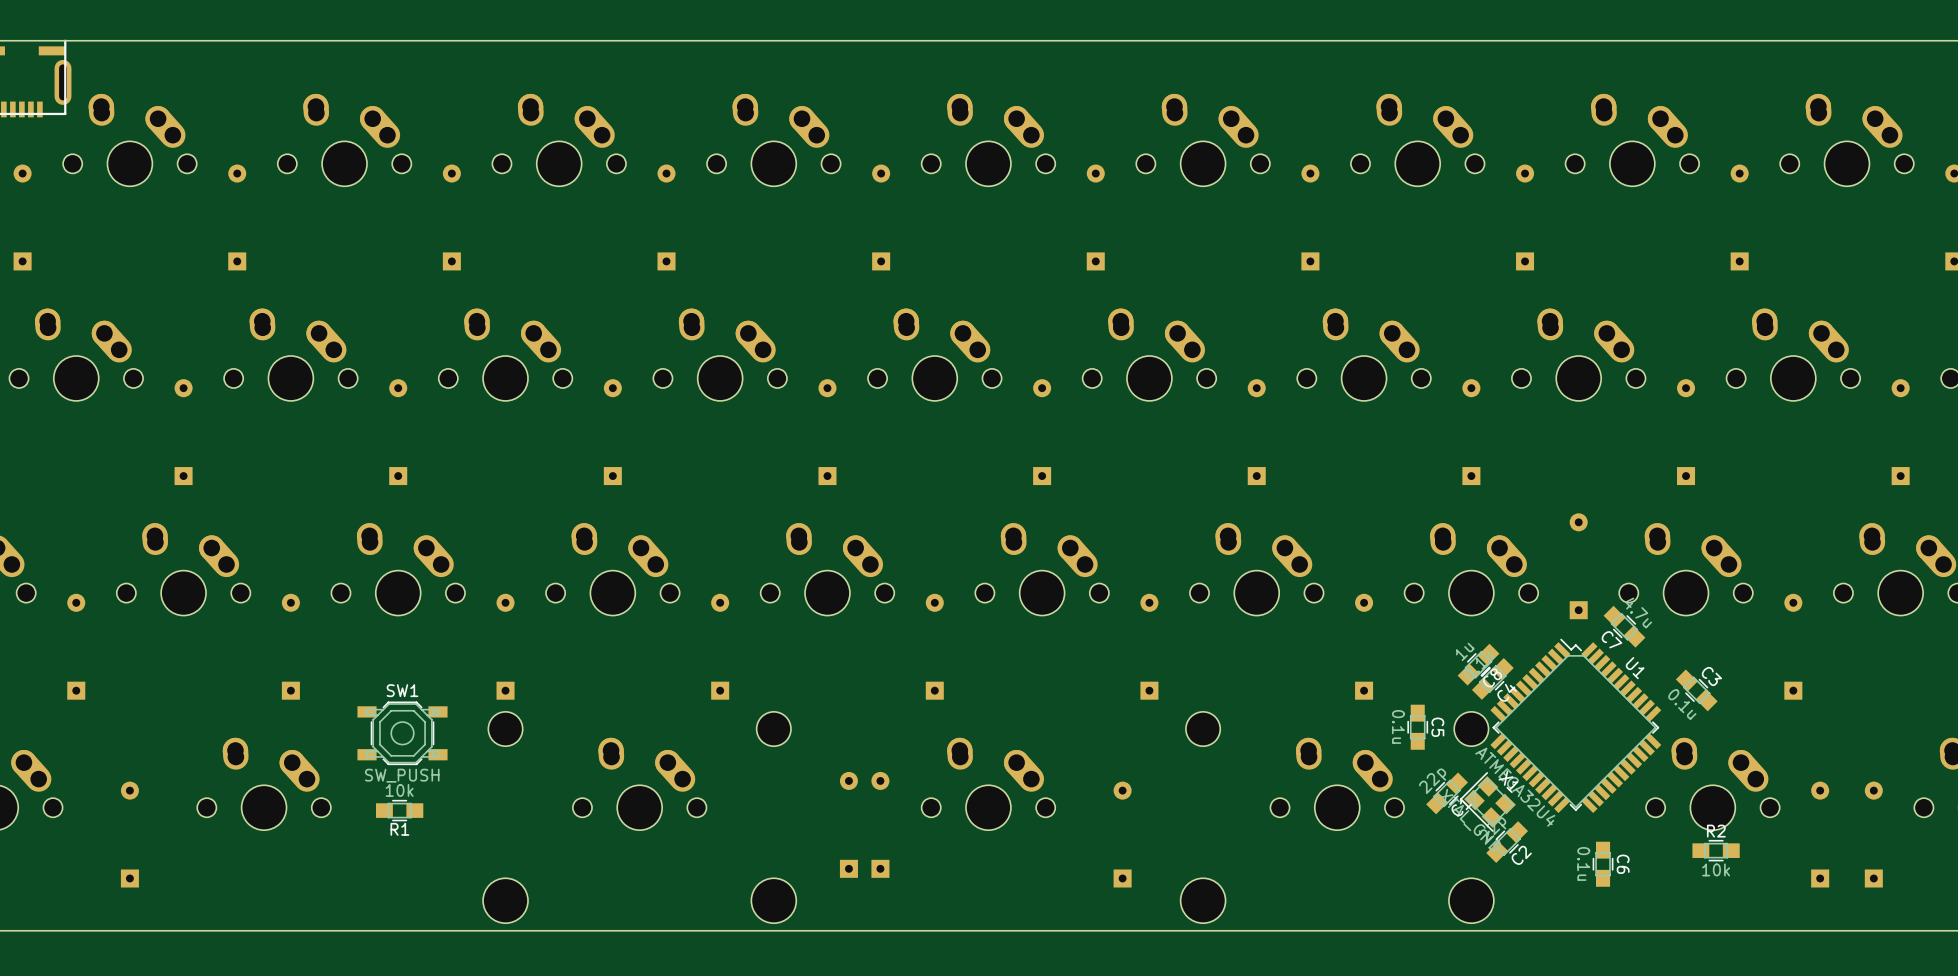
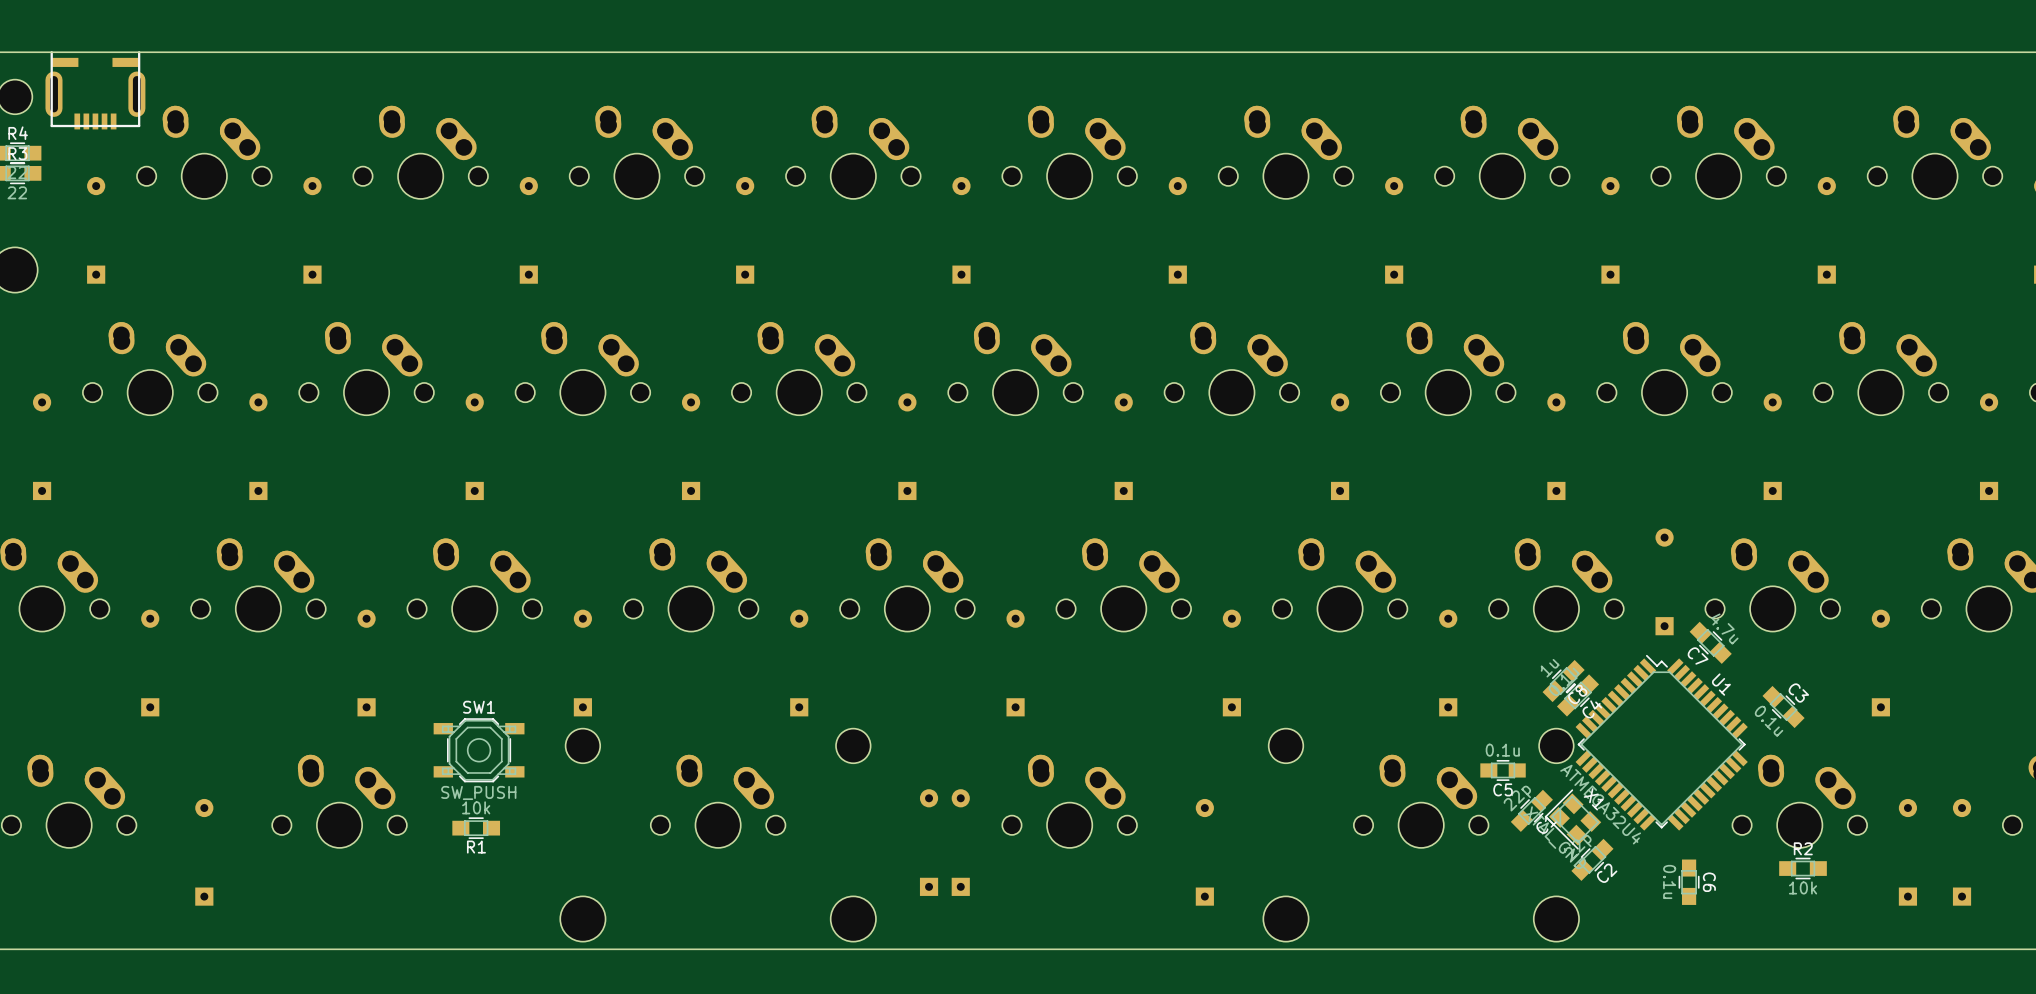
C5 rotation: 0° (1417, 727) -> 90° clockwise (1503, 770)

